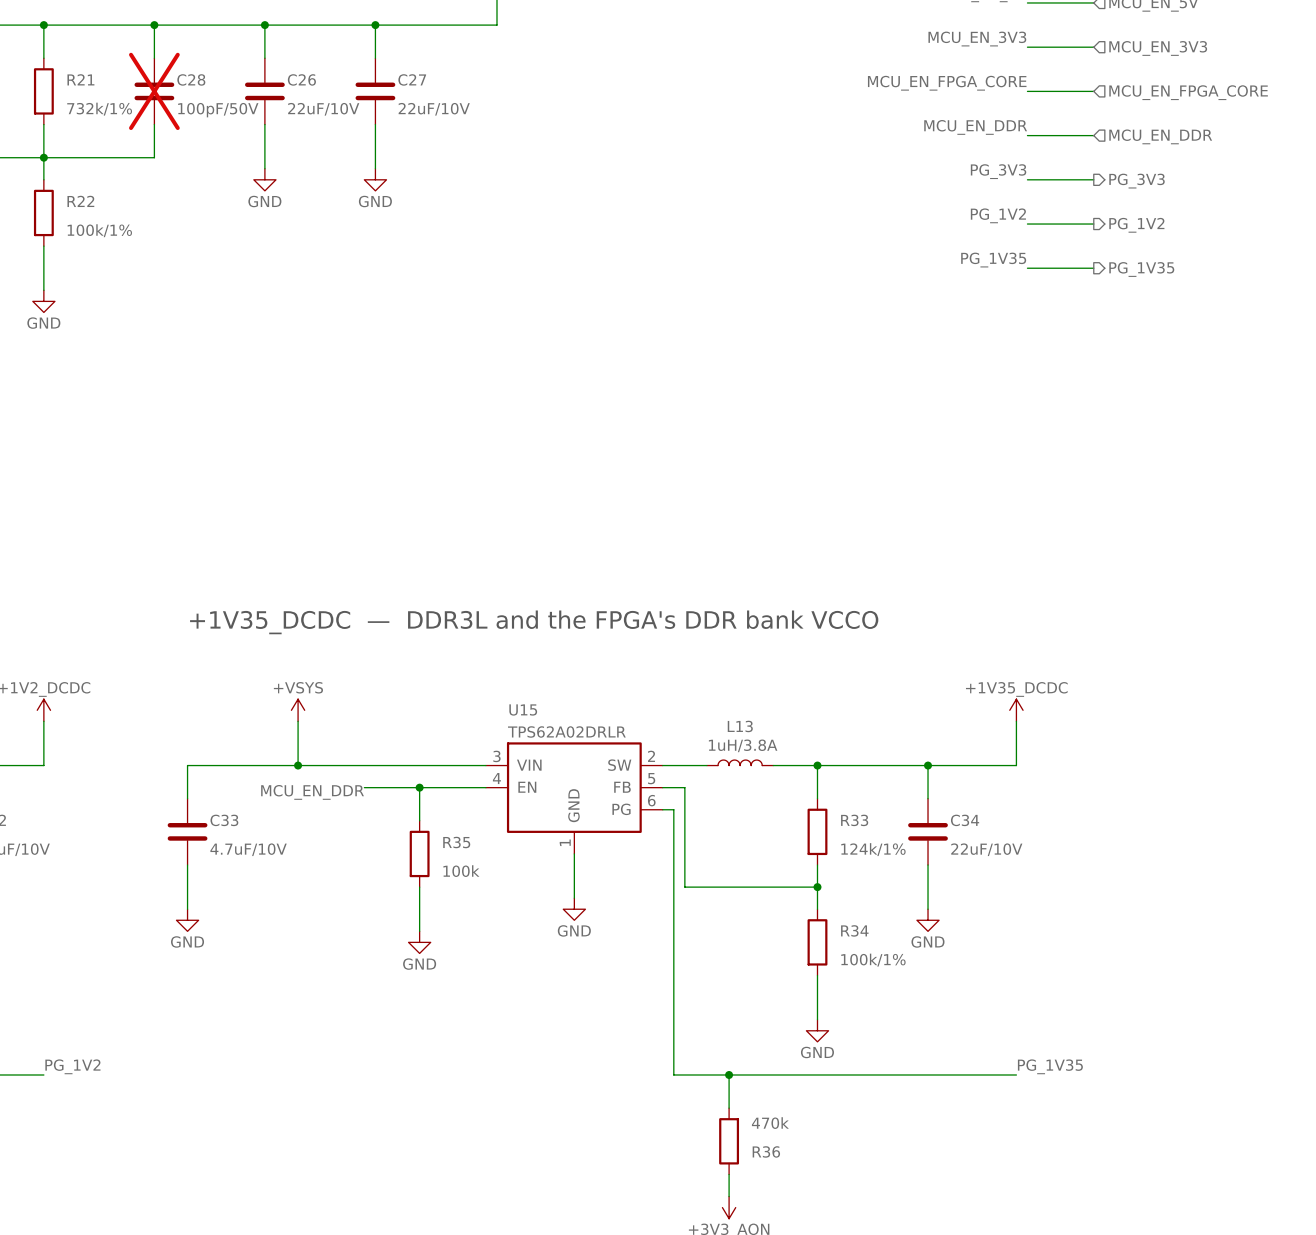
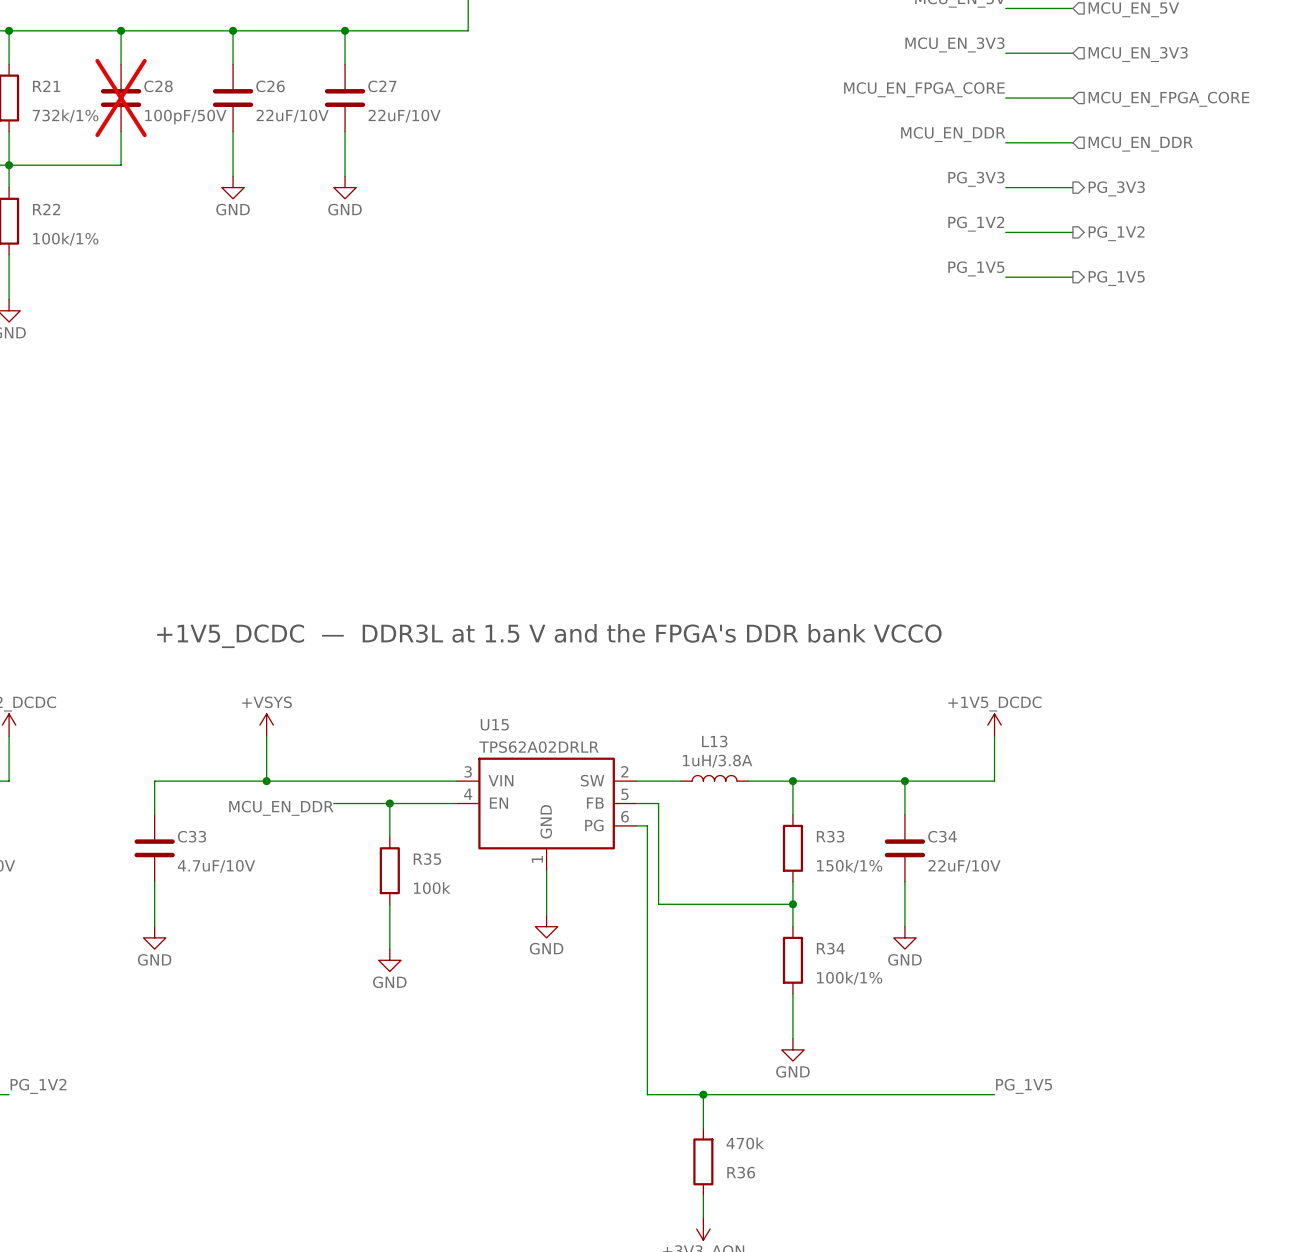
label: PG_1V35 (993, 260) -> PG_1V5 (976, 268)
hierarchical label: PG_1V35 (1141, 269) -> PG_1V5 (1116, 278)
text: +1V35_DCDC — DDR3L and the FPGA's DDR bank VCCO (534, 622) -> +1V5_DCDC — DDR3L at 1.5 V and the FPGA's DDR bank VCCO (549, 636)
power symbol: +1V35_DCDC (1016, 710) -> +1V5_DCDC (994, 725)
R33 value: 124k/1% (873, 849) -> 150k/1% (849, 866)
label: PG_1V35 (1050, 1066) -> PG_1V5 (1024, 1086)

